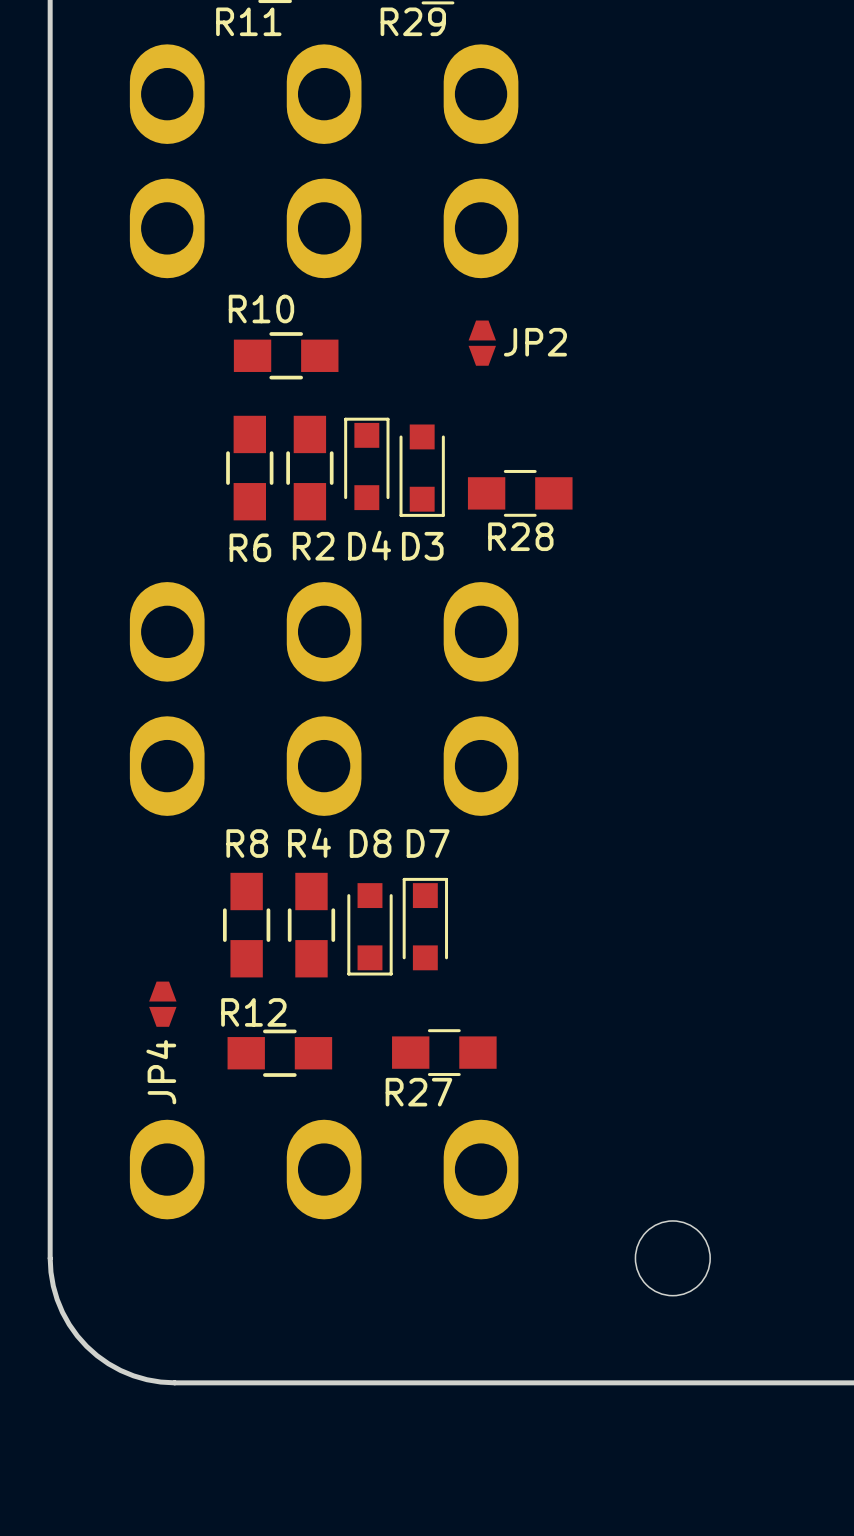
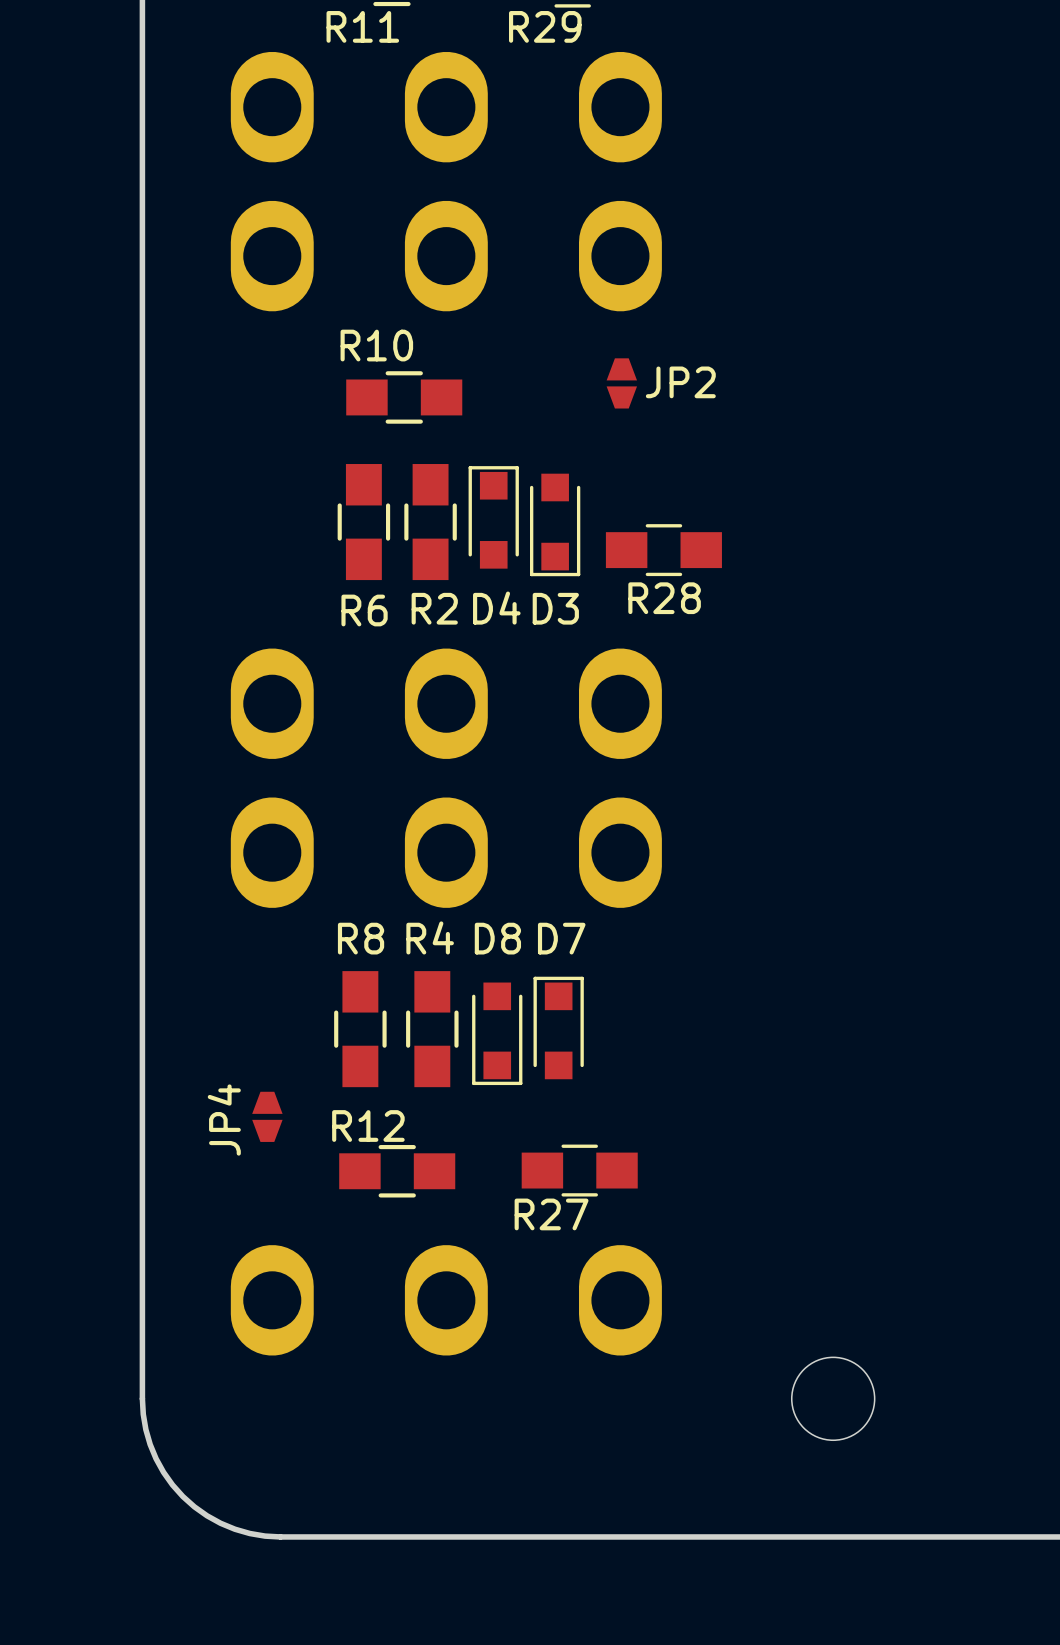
JP4 name position: JP4 (161, 1072) -> JP4 (224, 1120)

